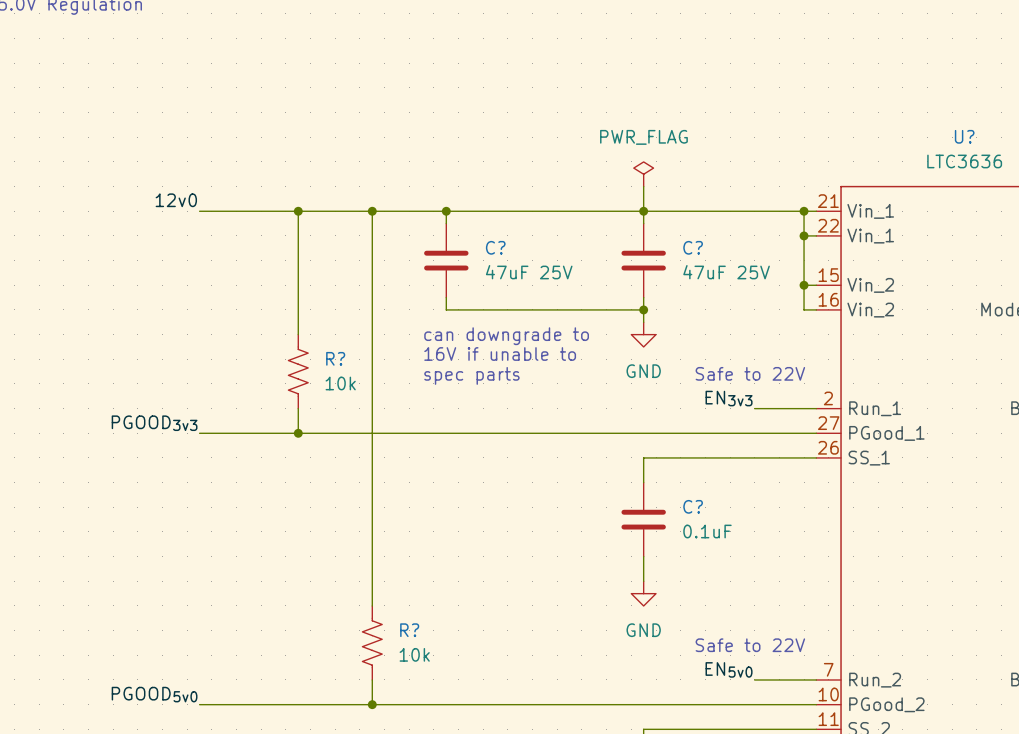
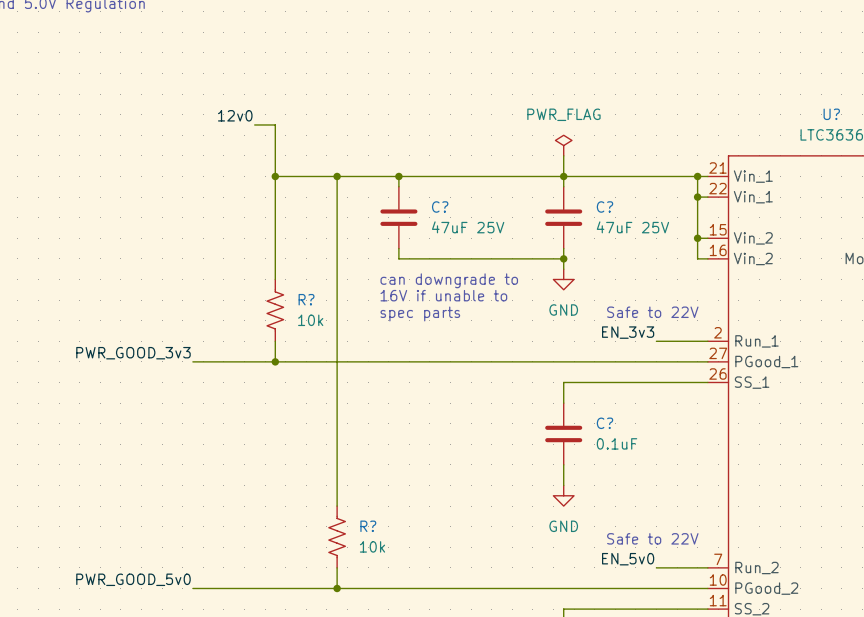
label position: 12v0 (176, 200) -> 12v0 (235, 115)
wire: (199, 211) (298, 211) -> (254, 124) (275, 124) (275, 176)
label: EN3v3 (729, 398) -> EN_3v3 (628, 332)
label: PGOOD3v3 (154, 423) -> PWR_GOOD_3v3 (133, 353)
label: EN5v0 (729, 669) -> EN_5v0 (628, 559)
label: PGOOD5v0 (154, 694) -> PWR_GOOD_5v0 (133, 579)

